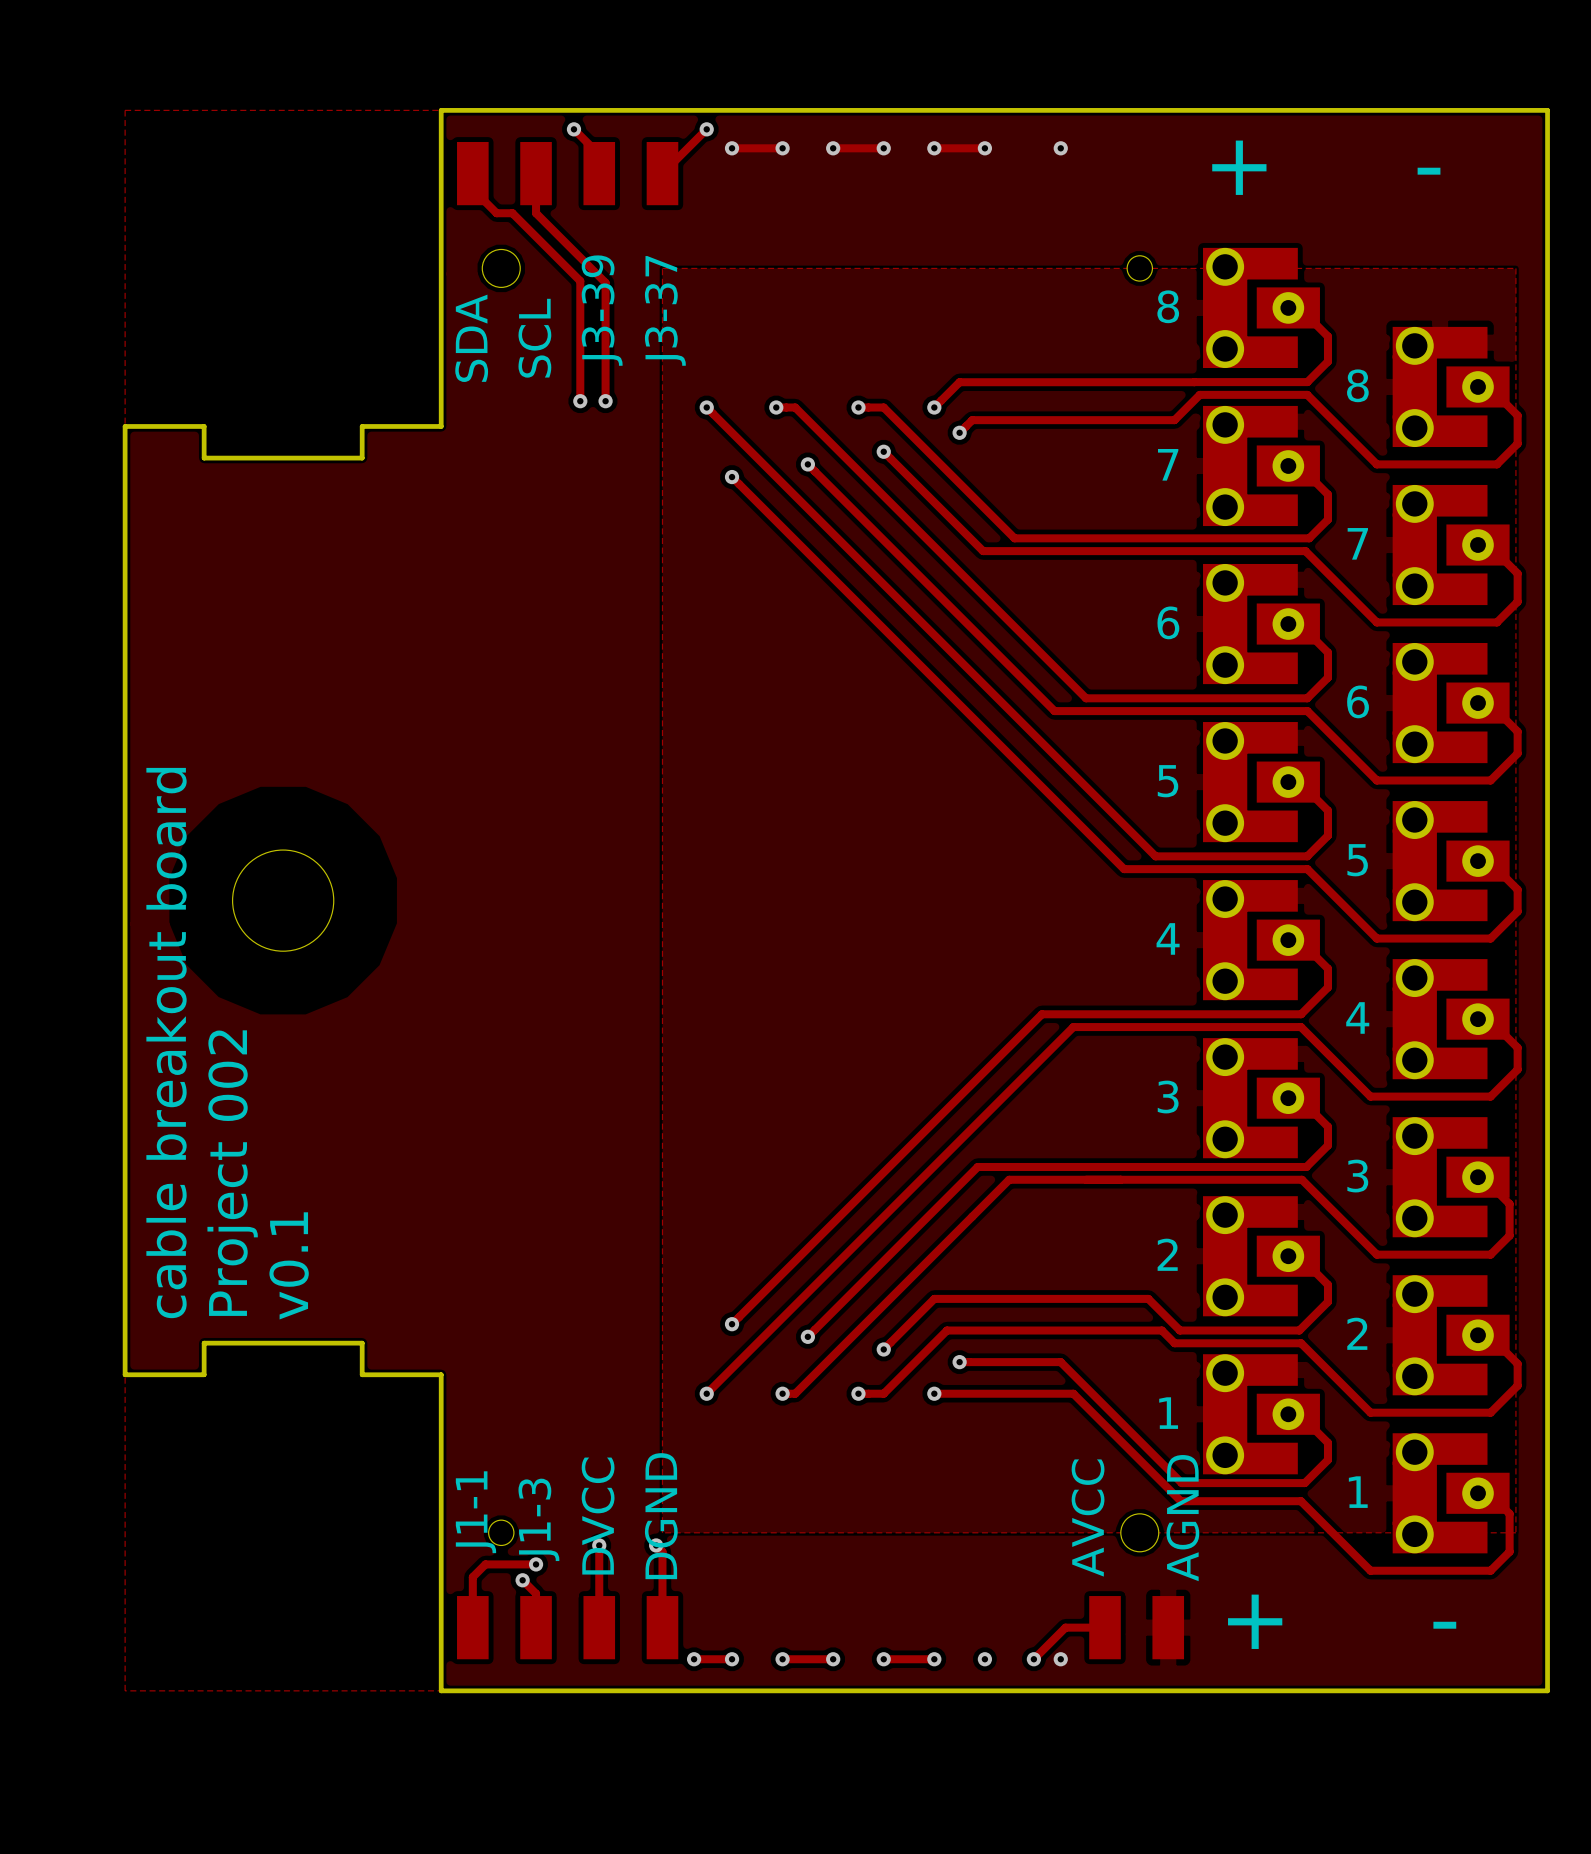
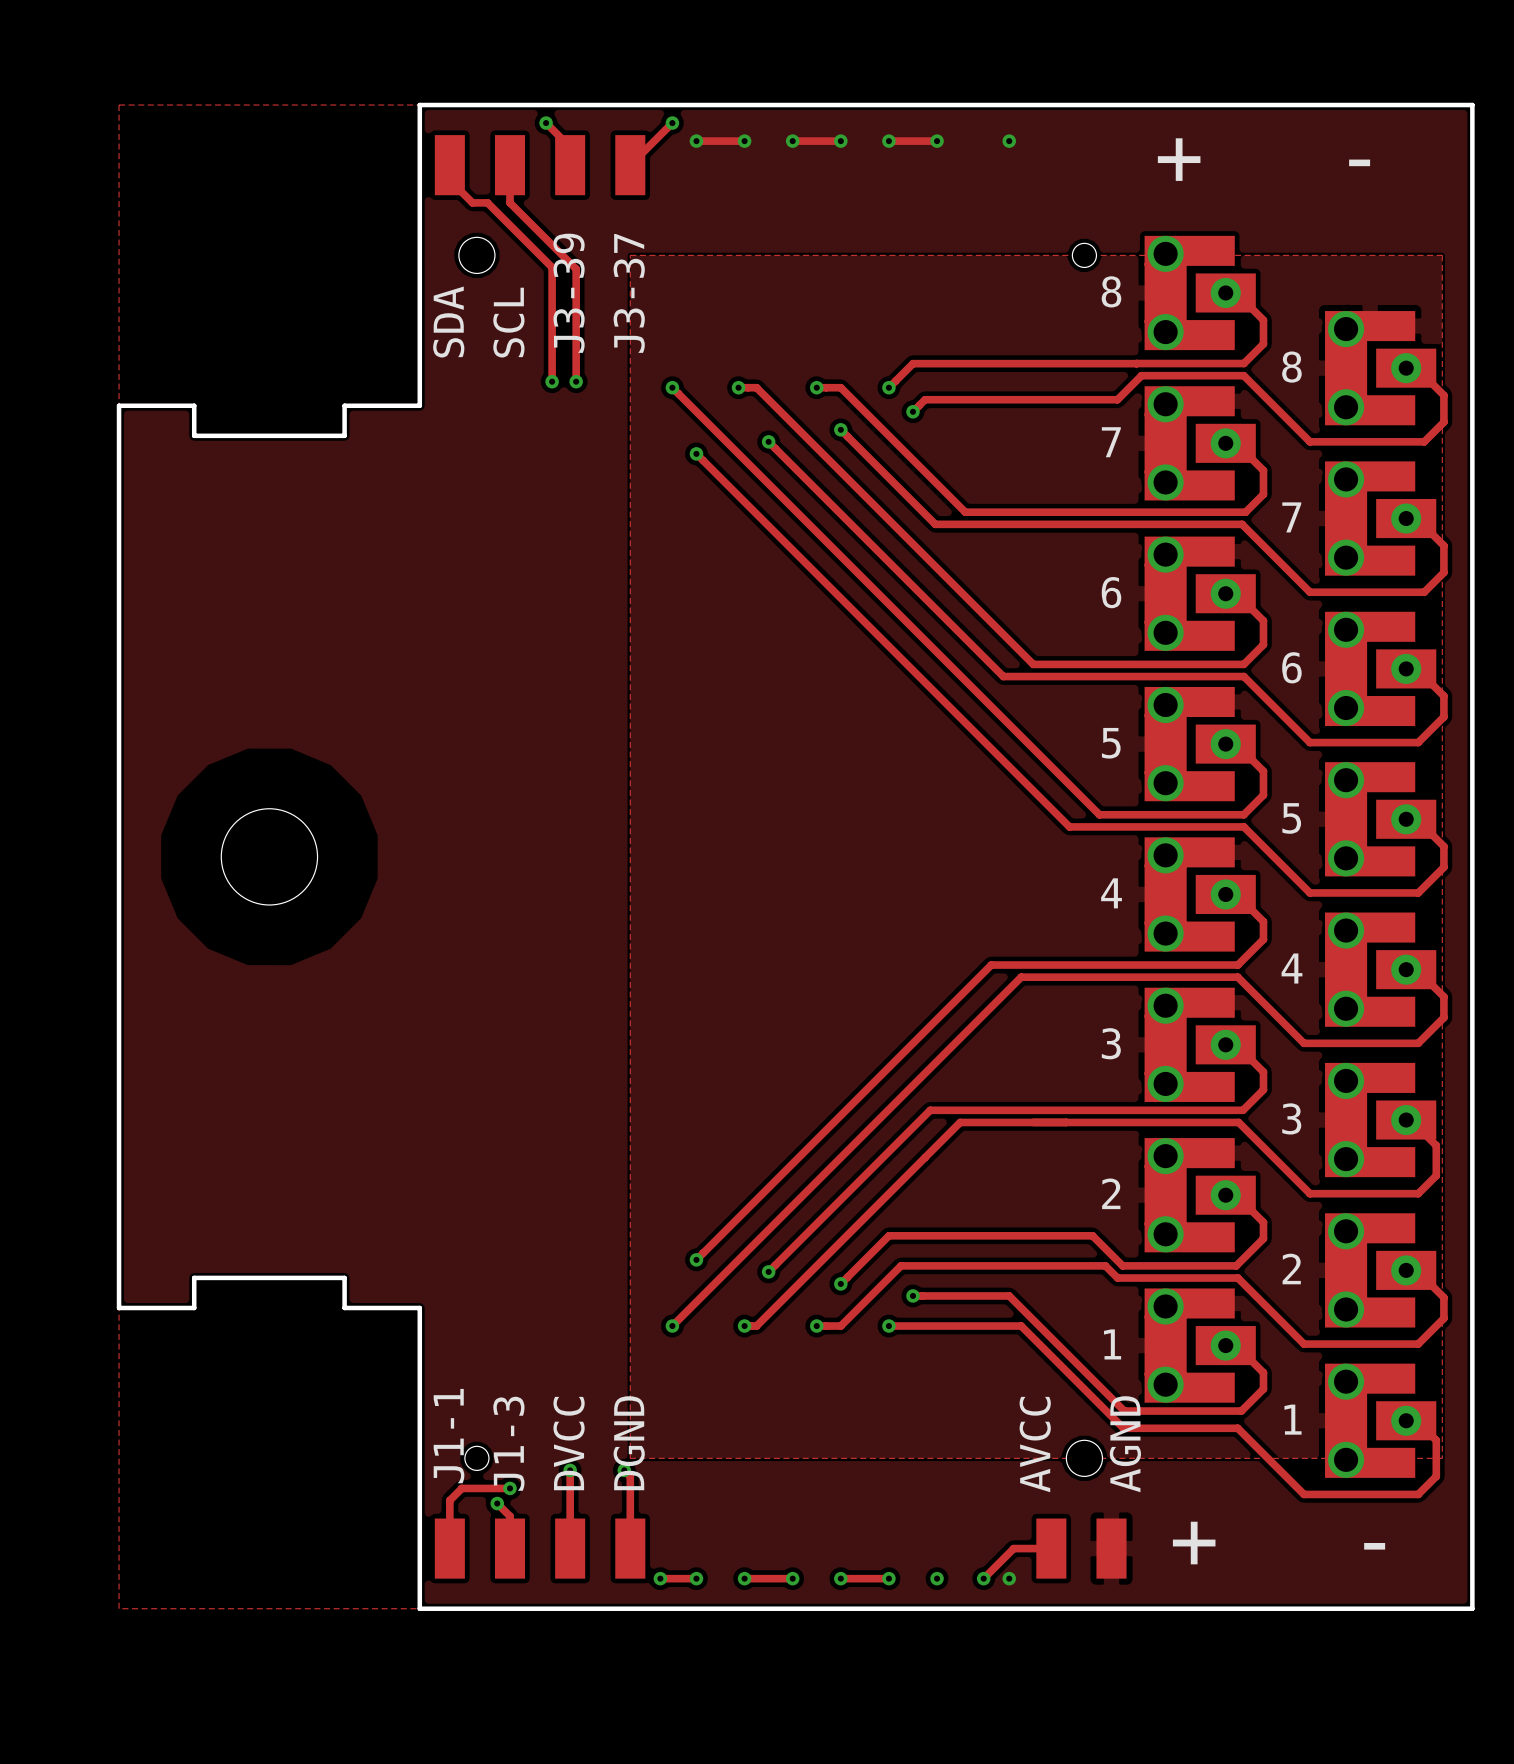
text: cable breakout board (166, 1043) -> none
text: Project 002 (232, 1173) -> none
text: v0.1 (289, 1265) -> none

